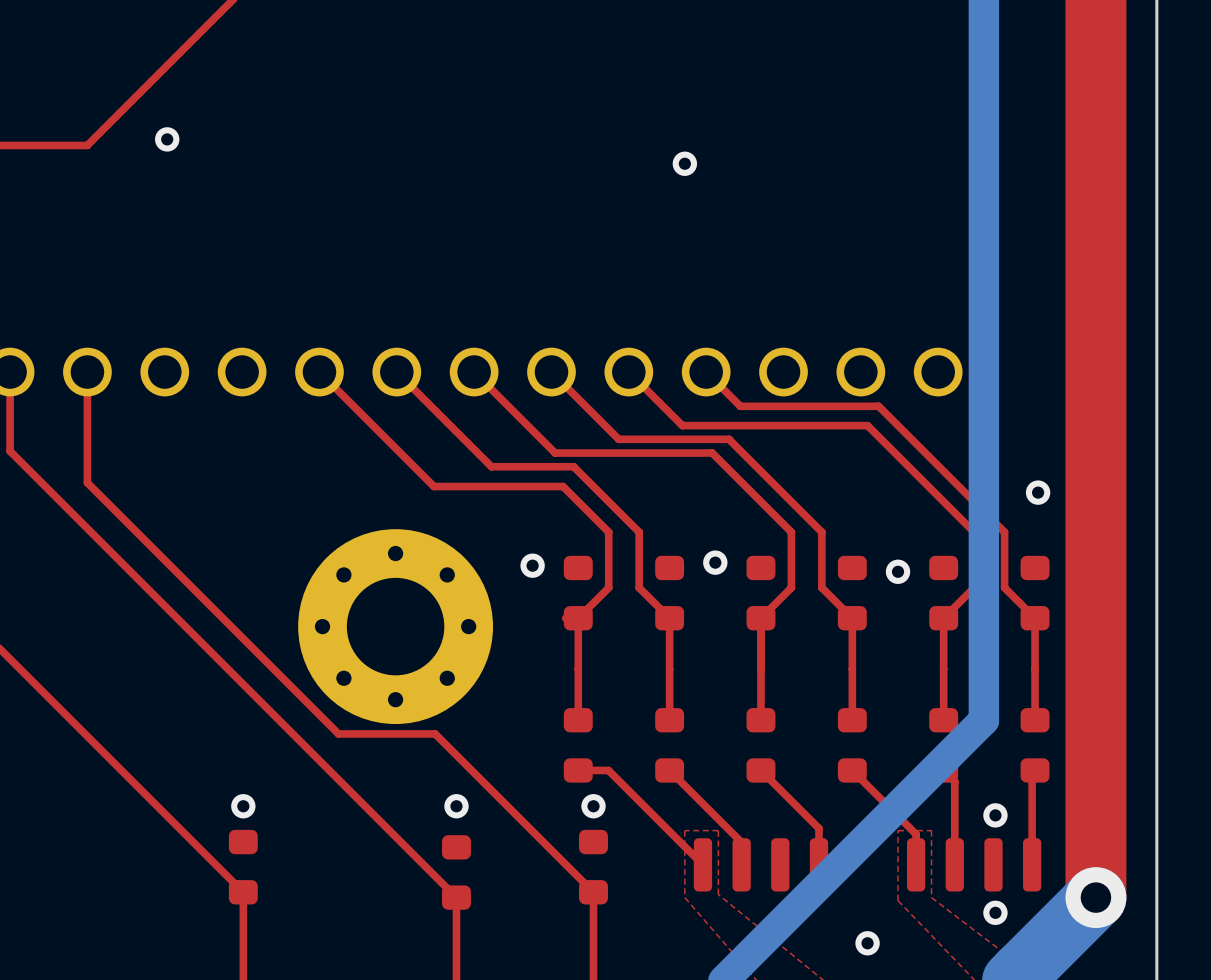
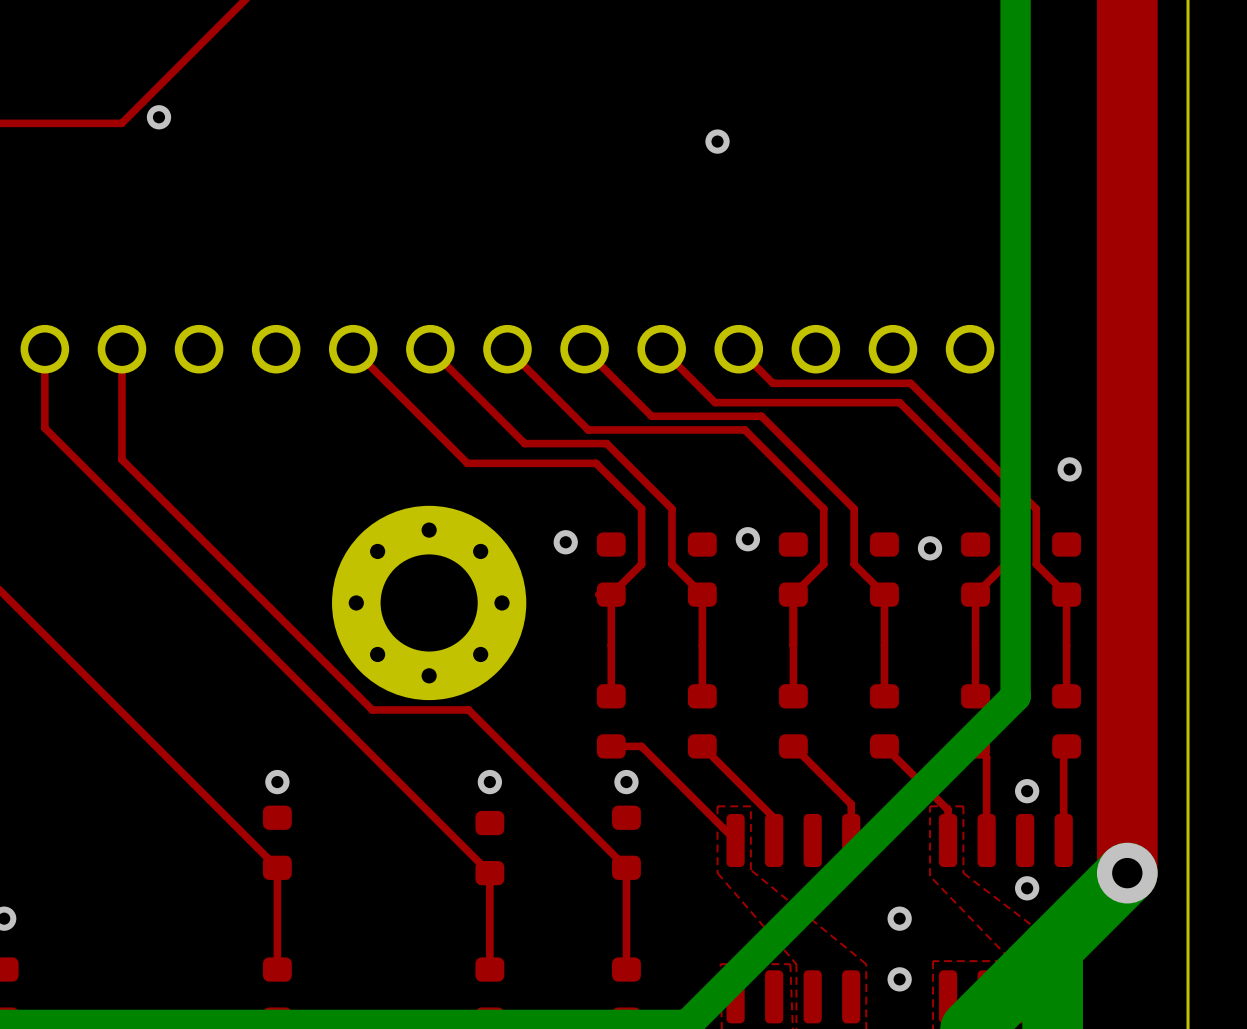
via position: (167, 139) -> (158, 117)

